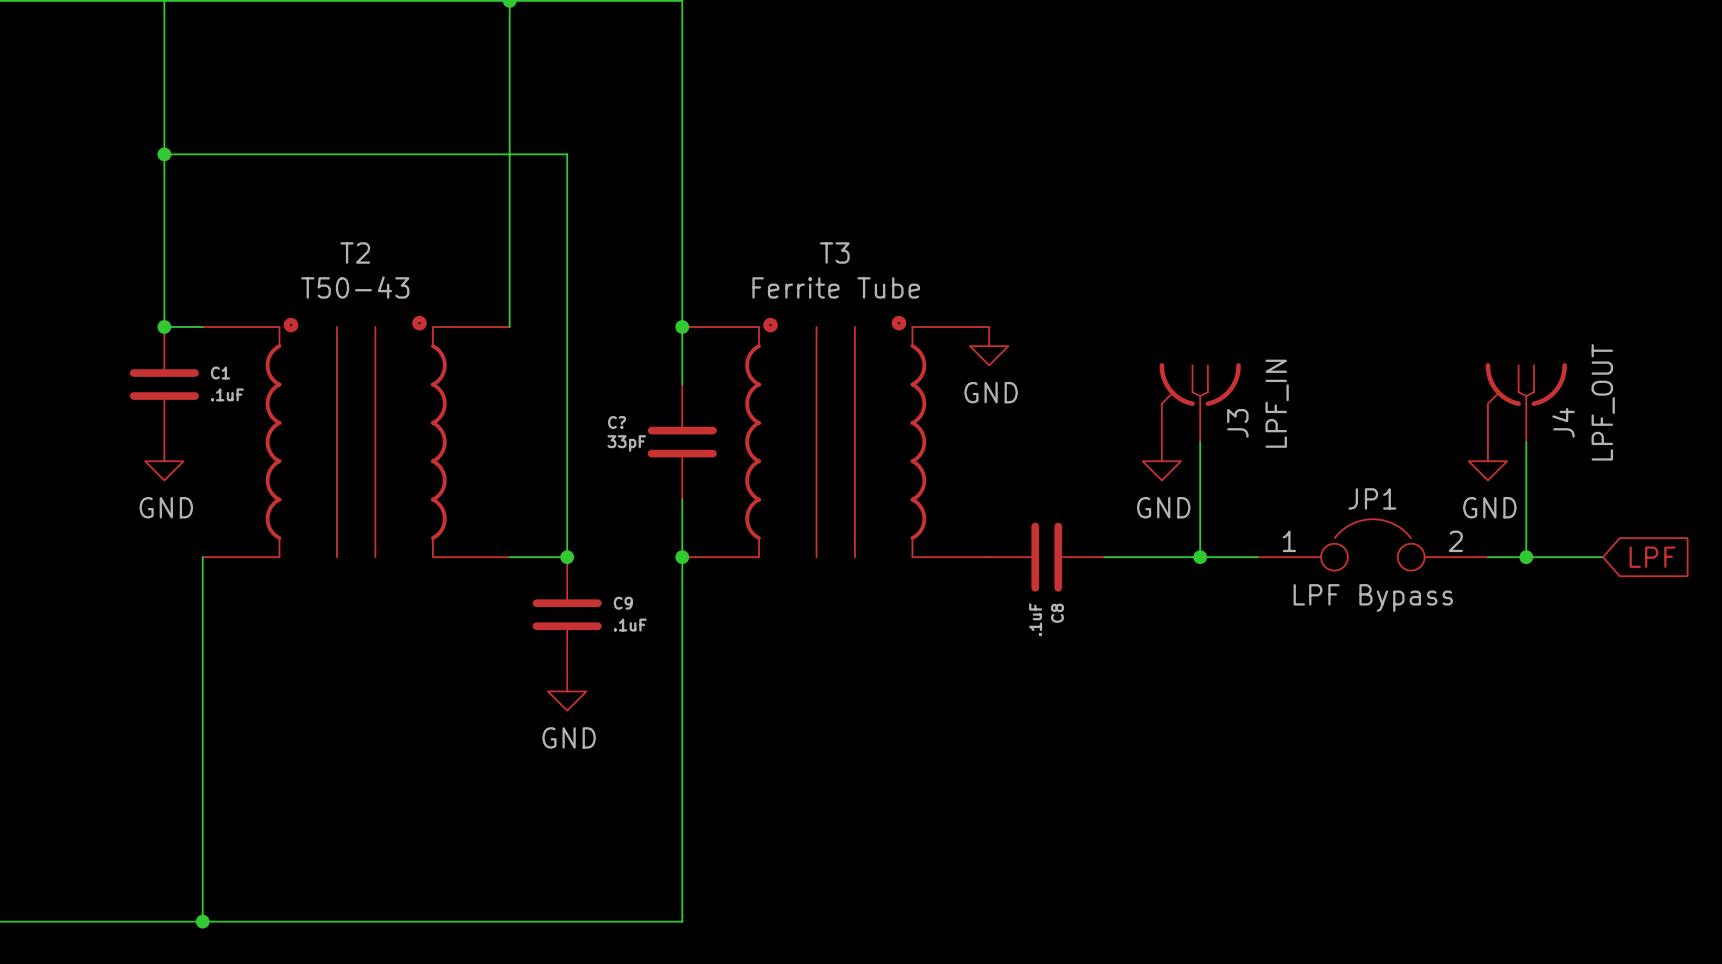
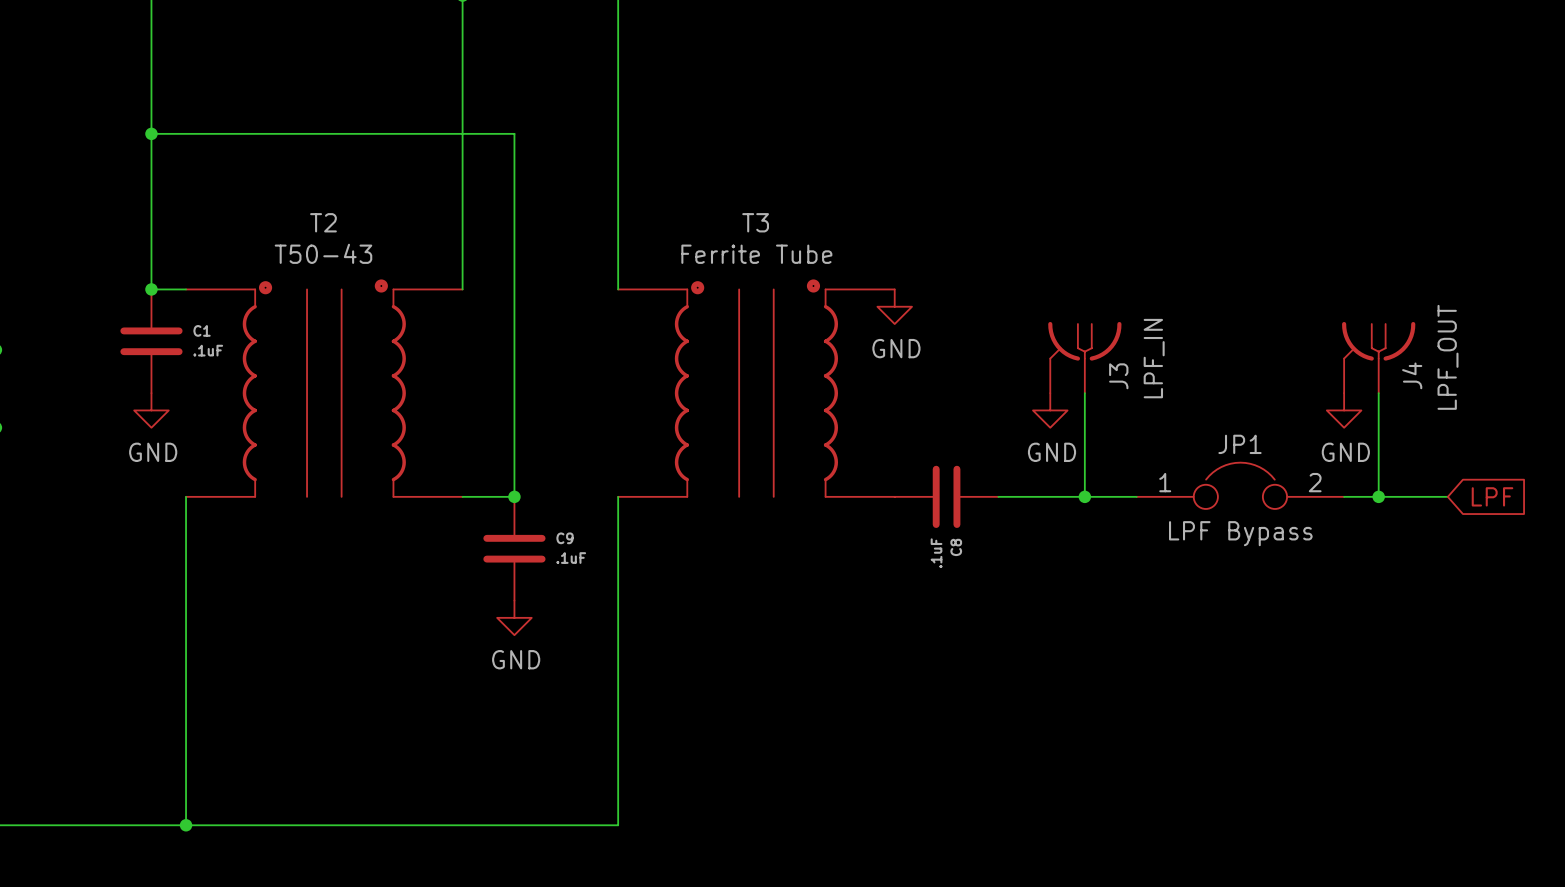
wire: (682, 326) (682, 384) -> none
junction: (682, 326) -> none
C?: 33pF (682, 442) -> none
wire: (682, 499) (682, 557) -> none
junction: (682, 557) -> none

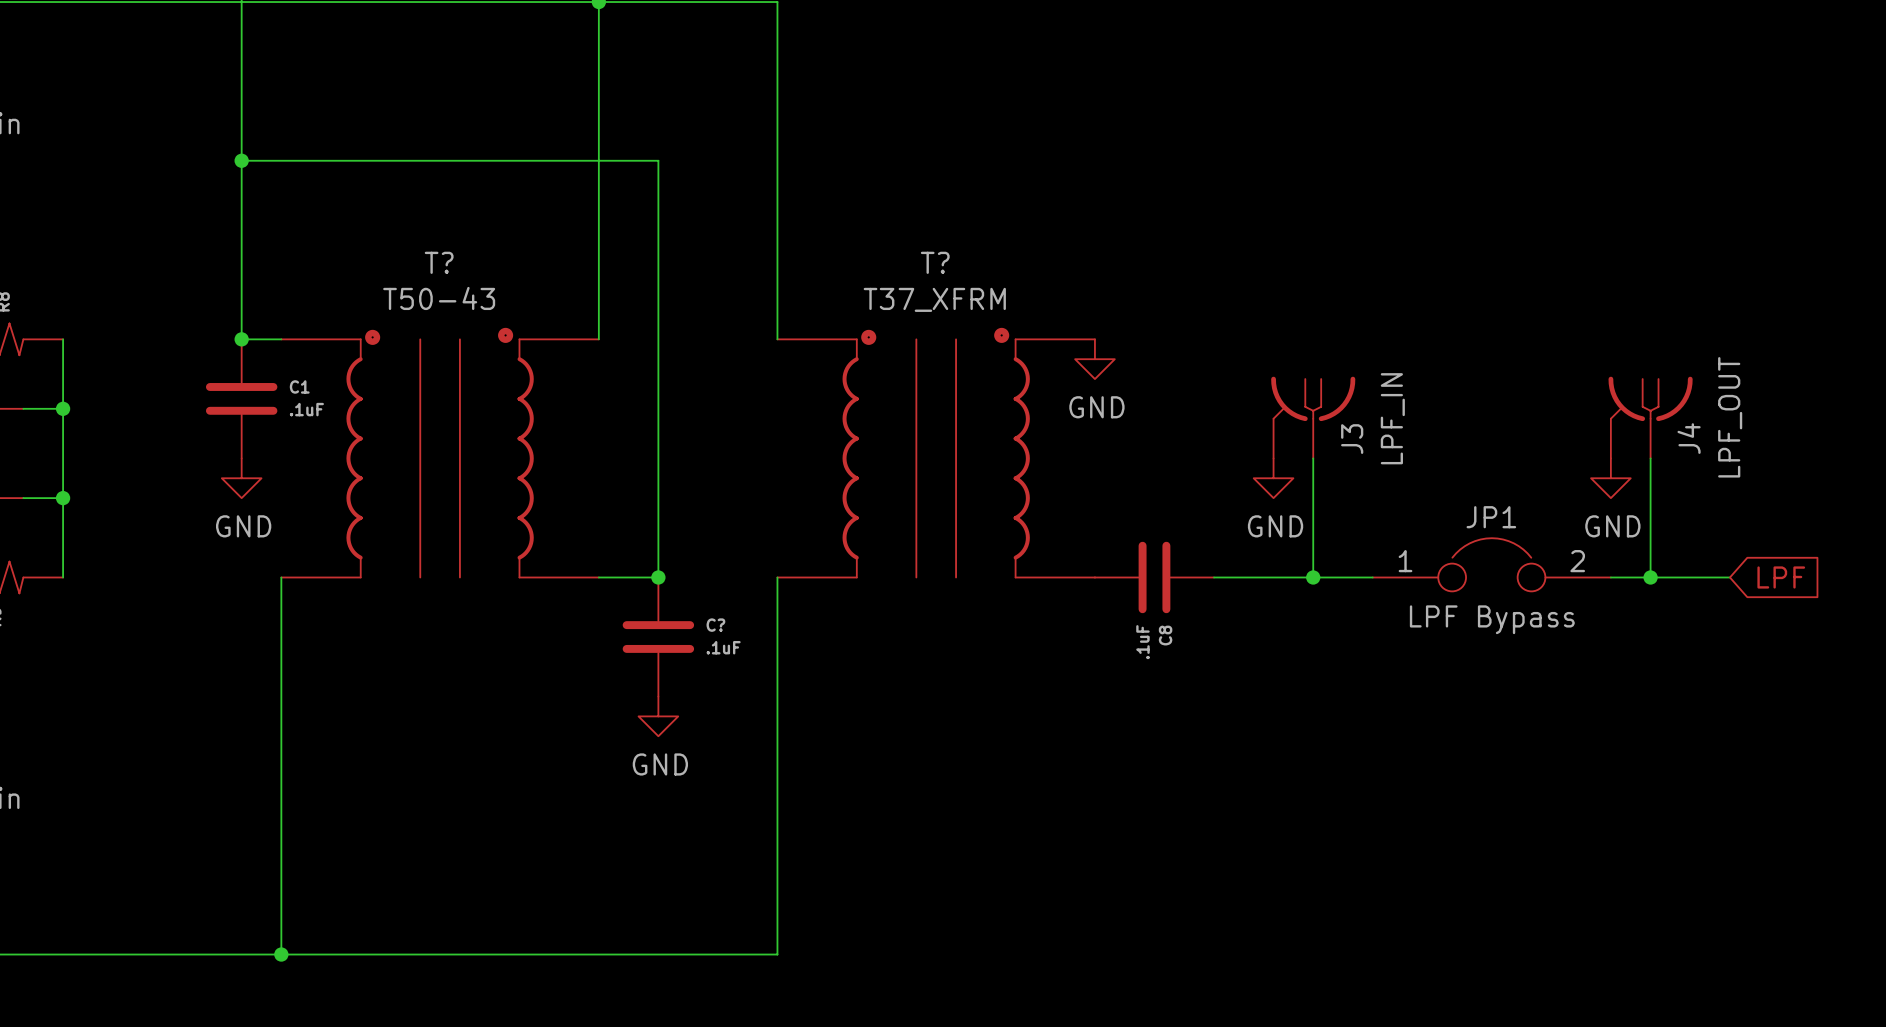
T2 name: T2 (323, 222) -> T? (439, 262)
T3 name: T3 (755, 222) -> T? (935, 262)
T3 value: Ferrite Tube (756, 254) -> T37_XFRM (934, 299)
C9 name: C9 (565, 538) -> C? (715, 625)

